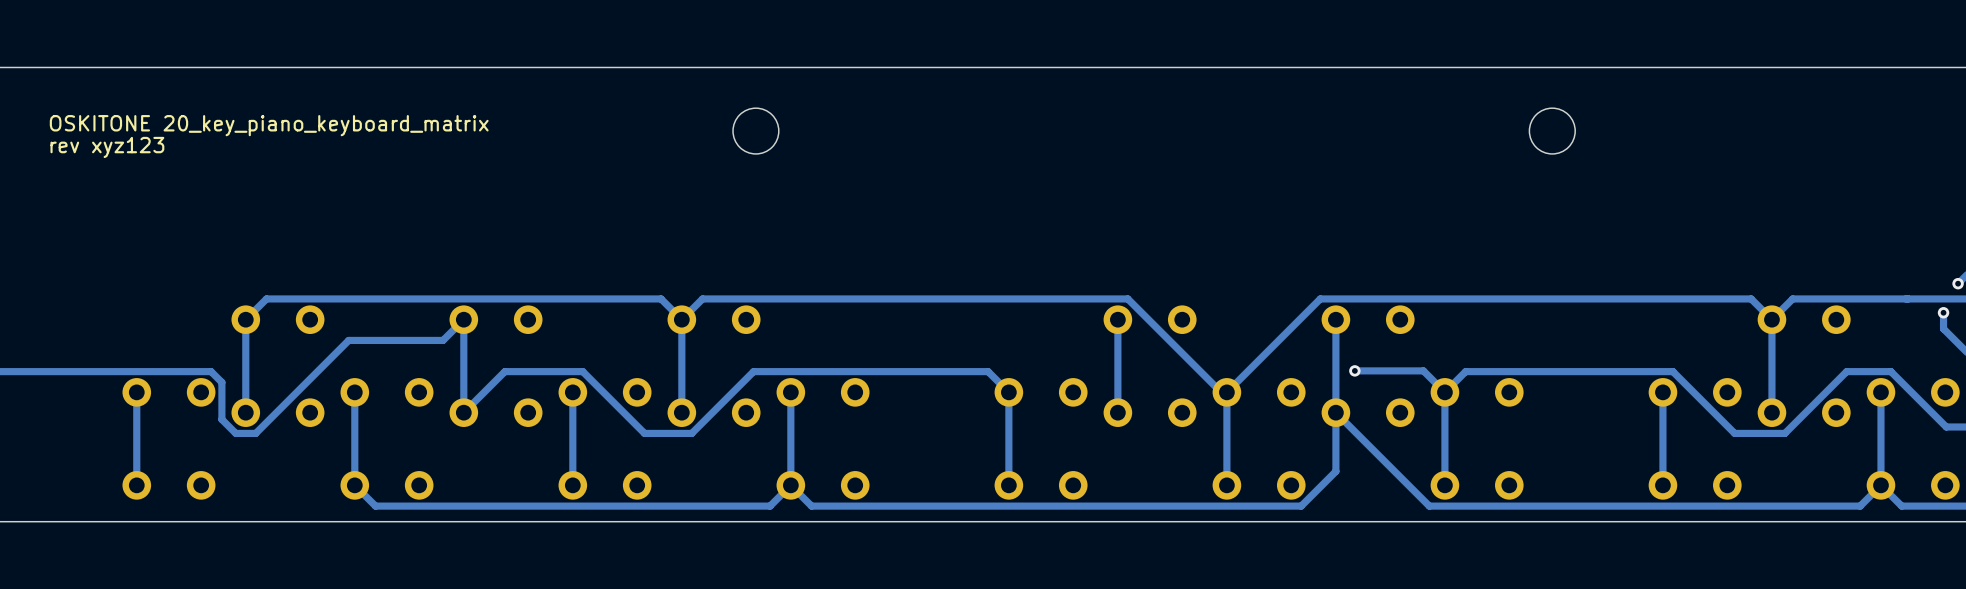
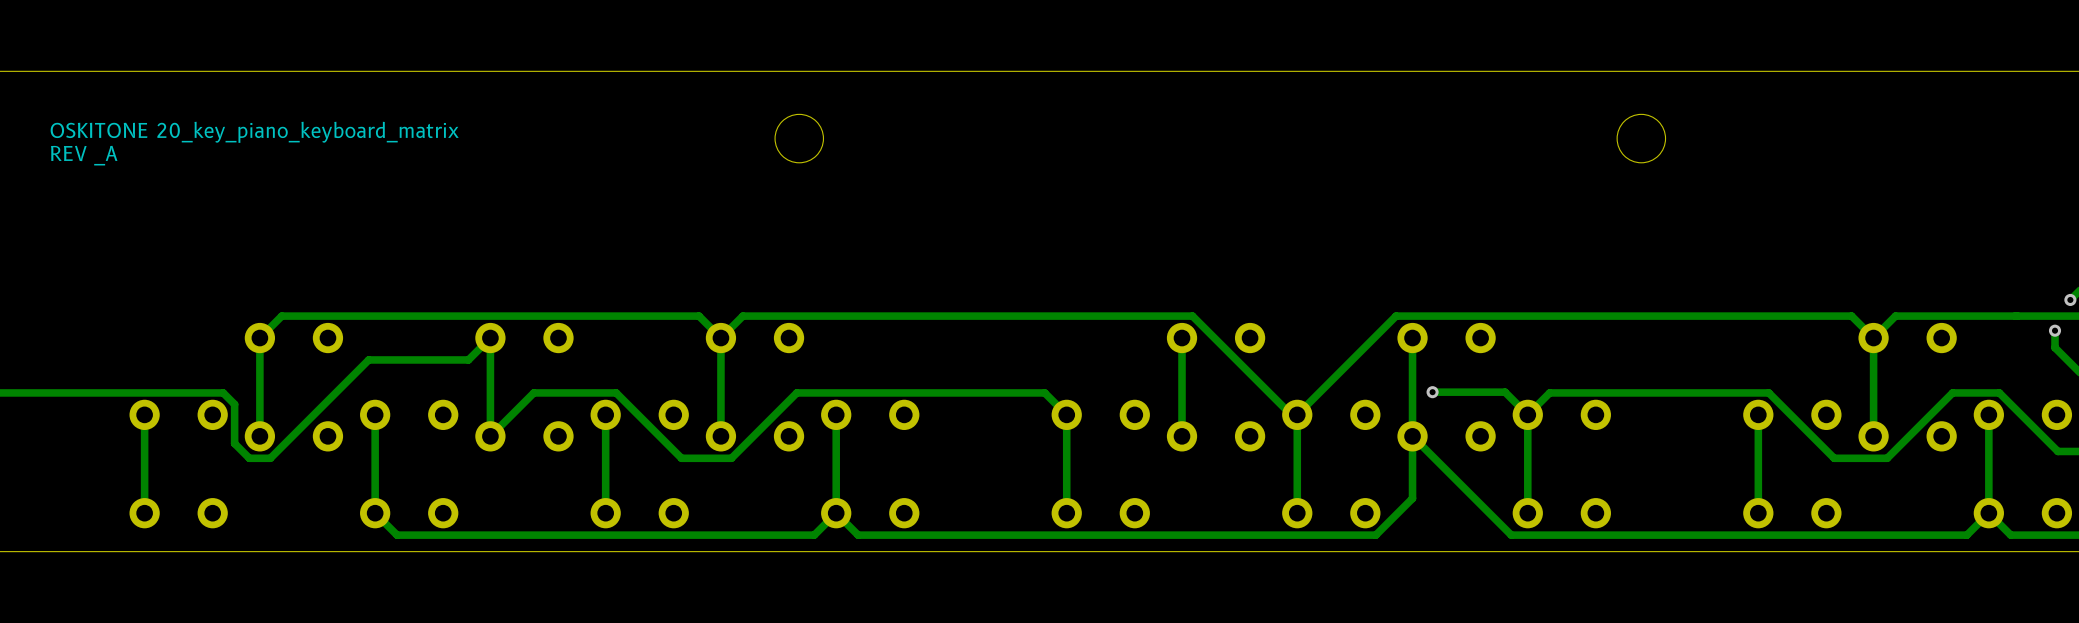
text: rev xyz123 (107, 147) -> REV _A (84, 155)

